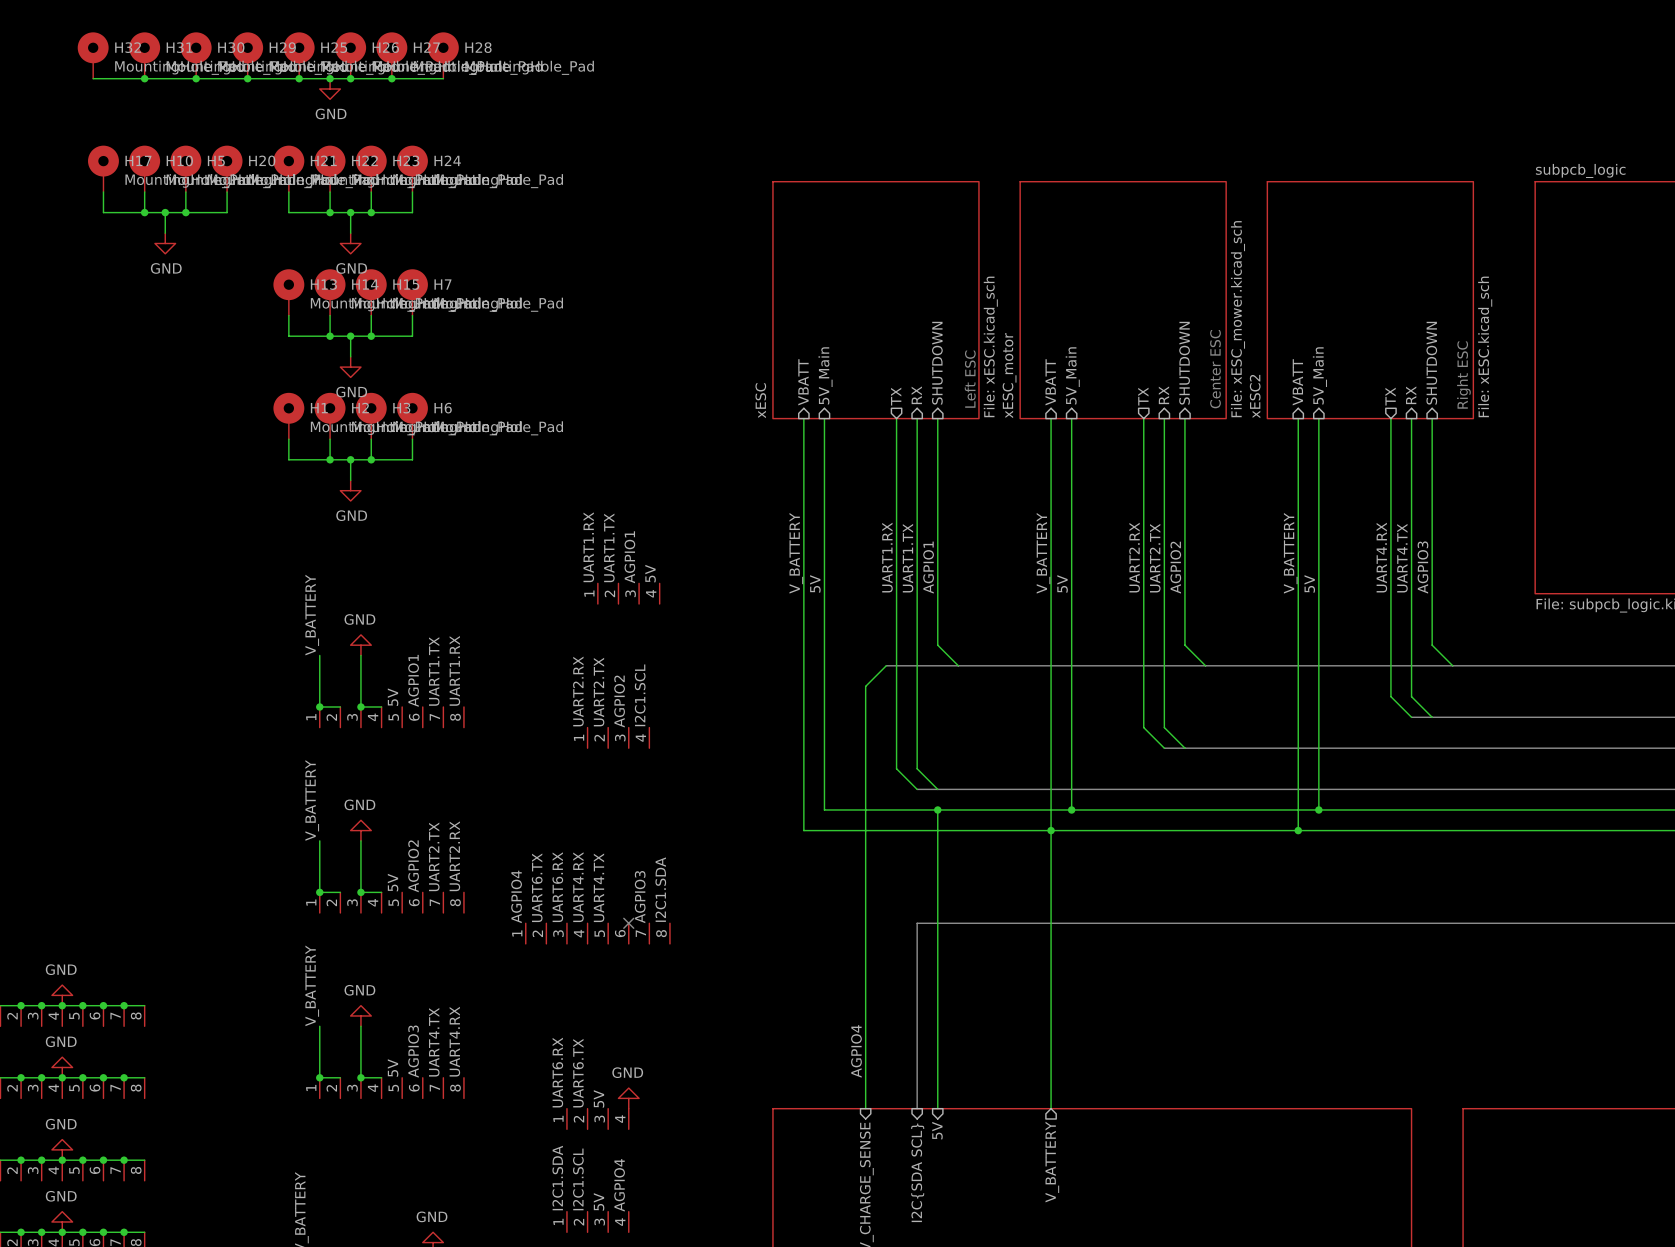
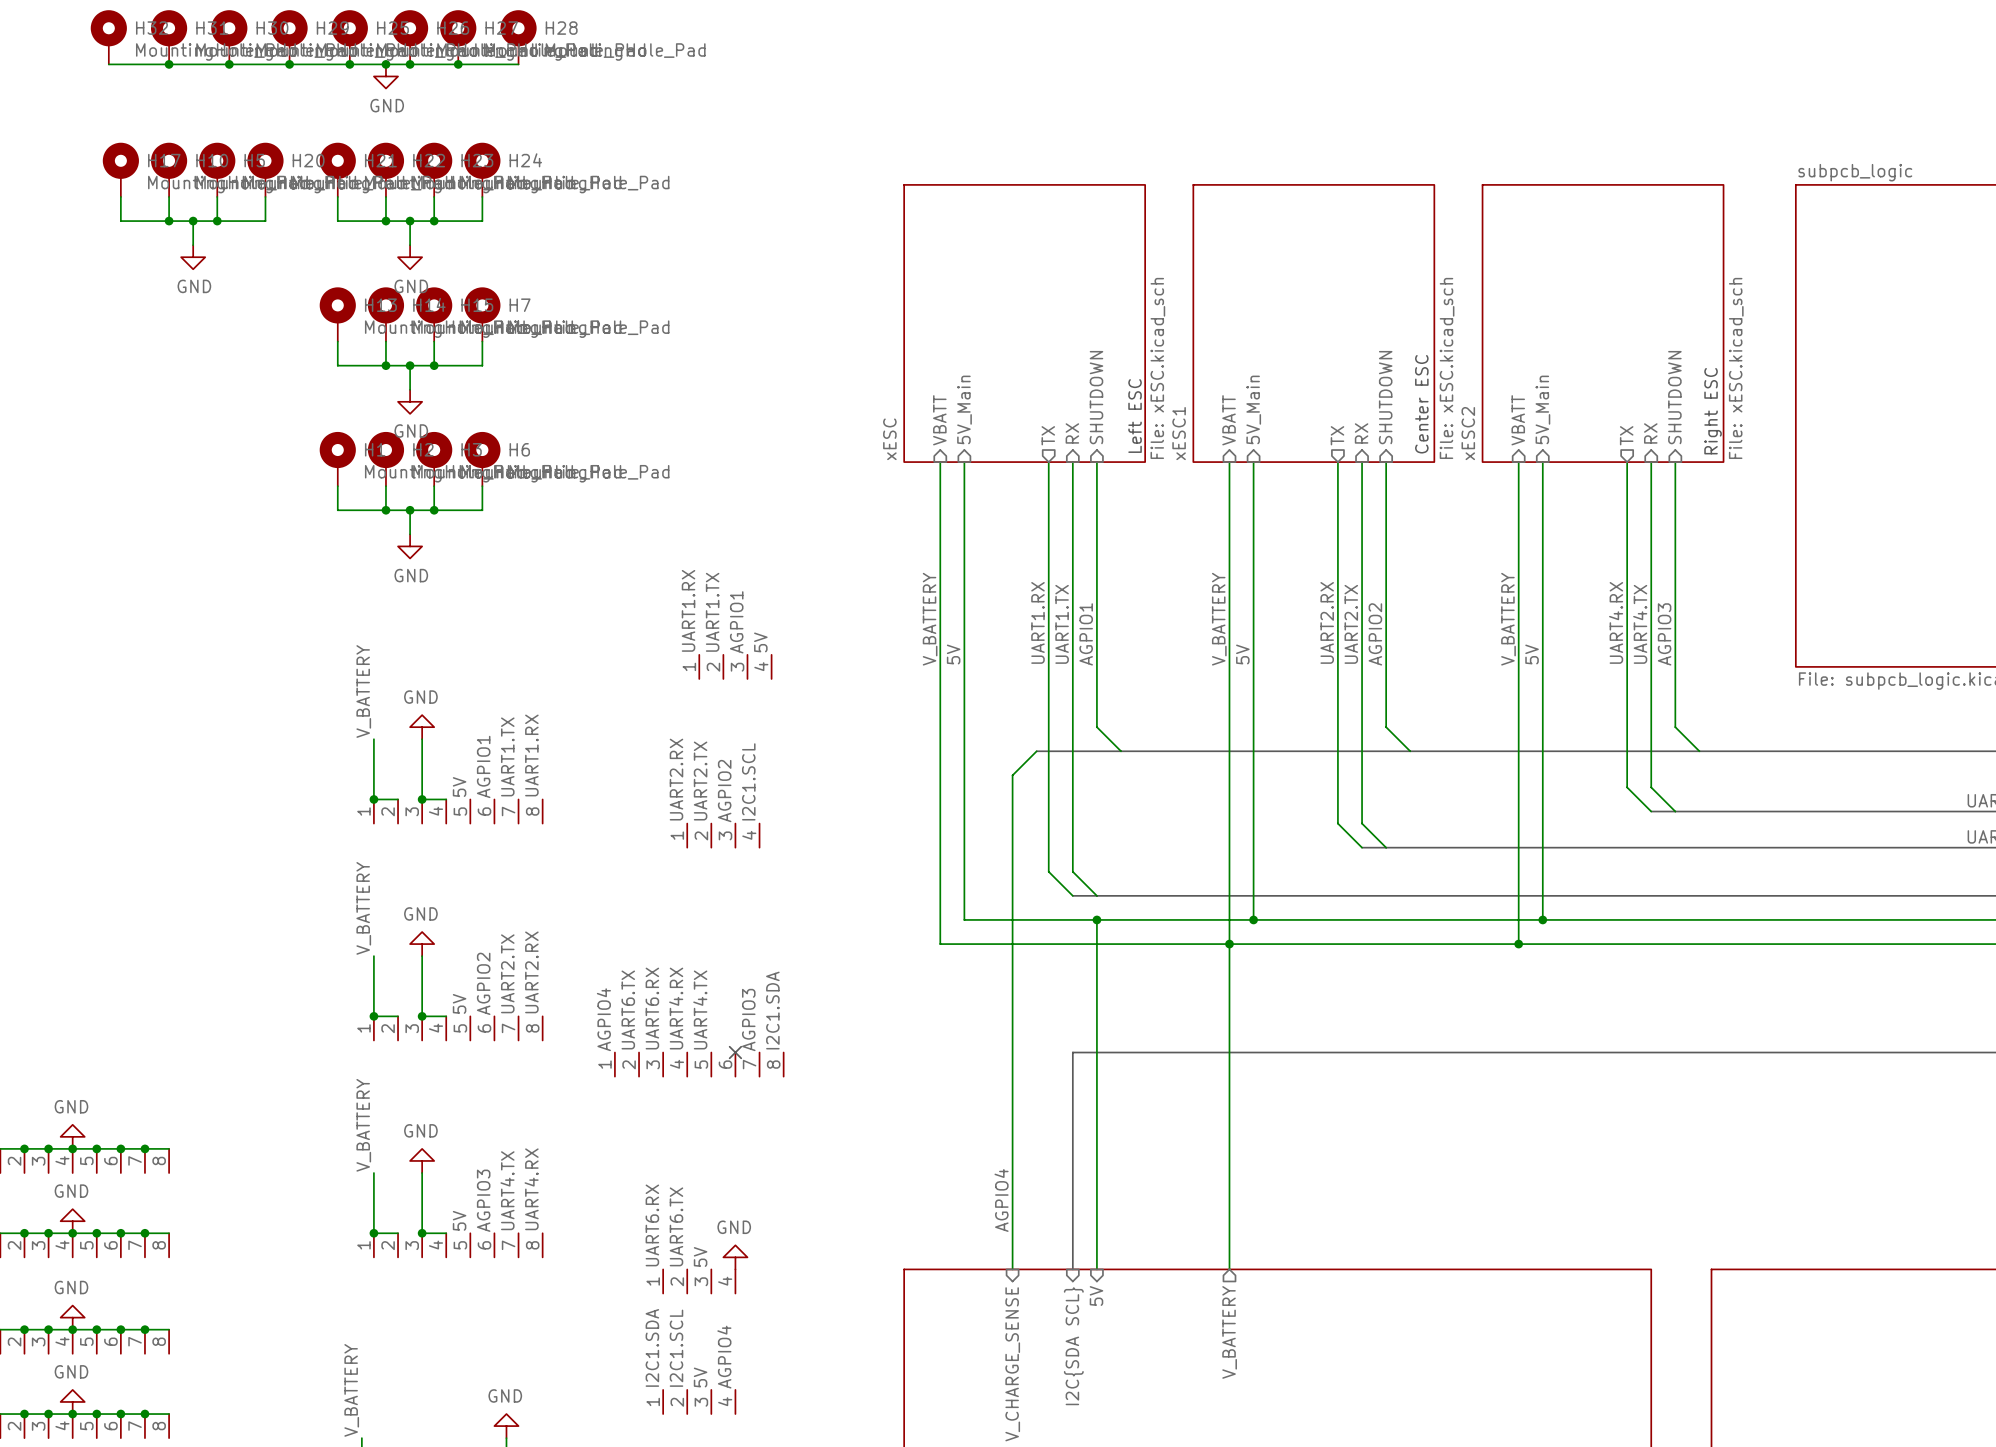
sheet xESC_motor value: File: xESC_mower.kicad_sch (1237, 319) -> File: xESC.kicad_sch (1447, 368)
sheet xESC_motor name: xESC_motor (1009, 375) -> xESC1 (1179, 433)

